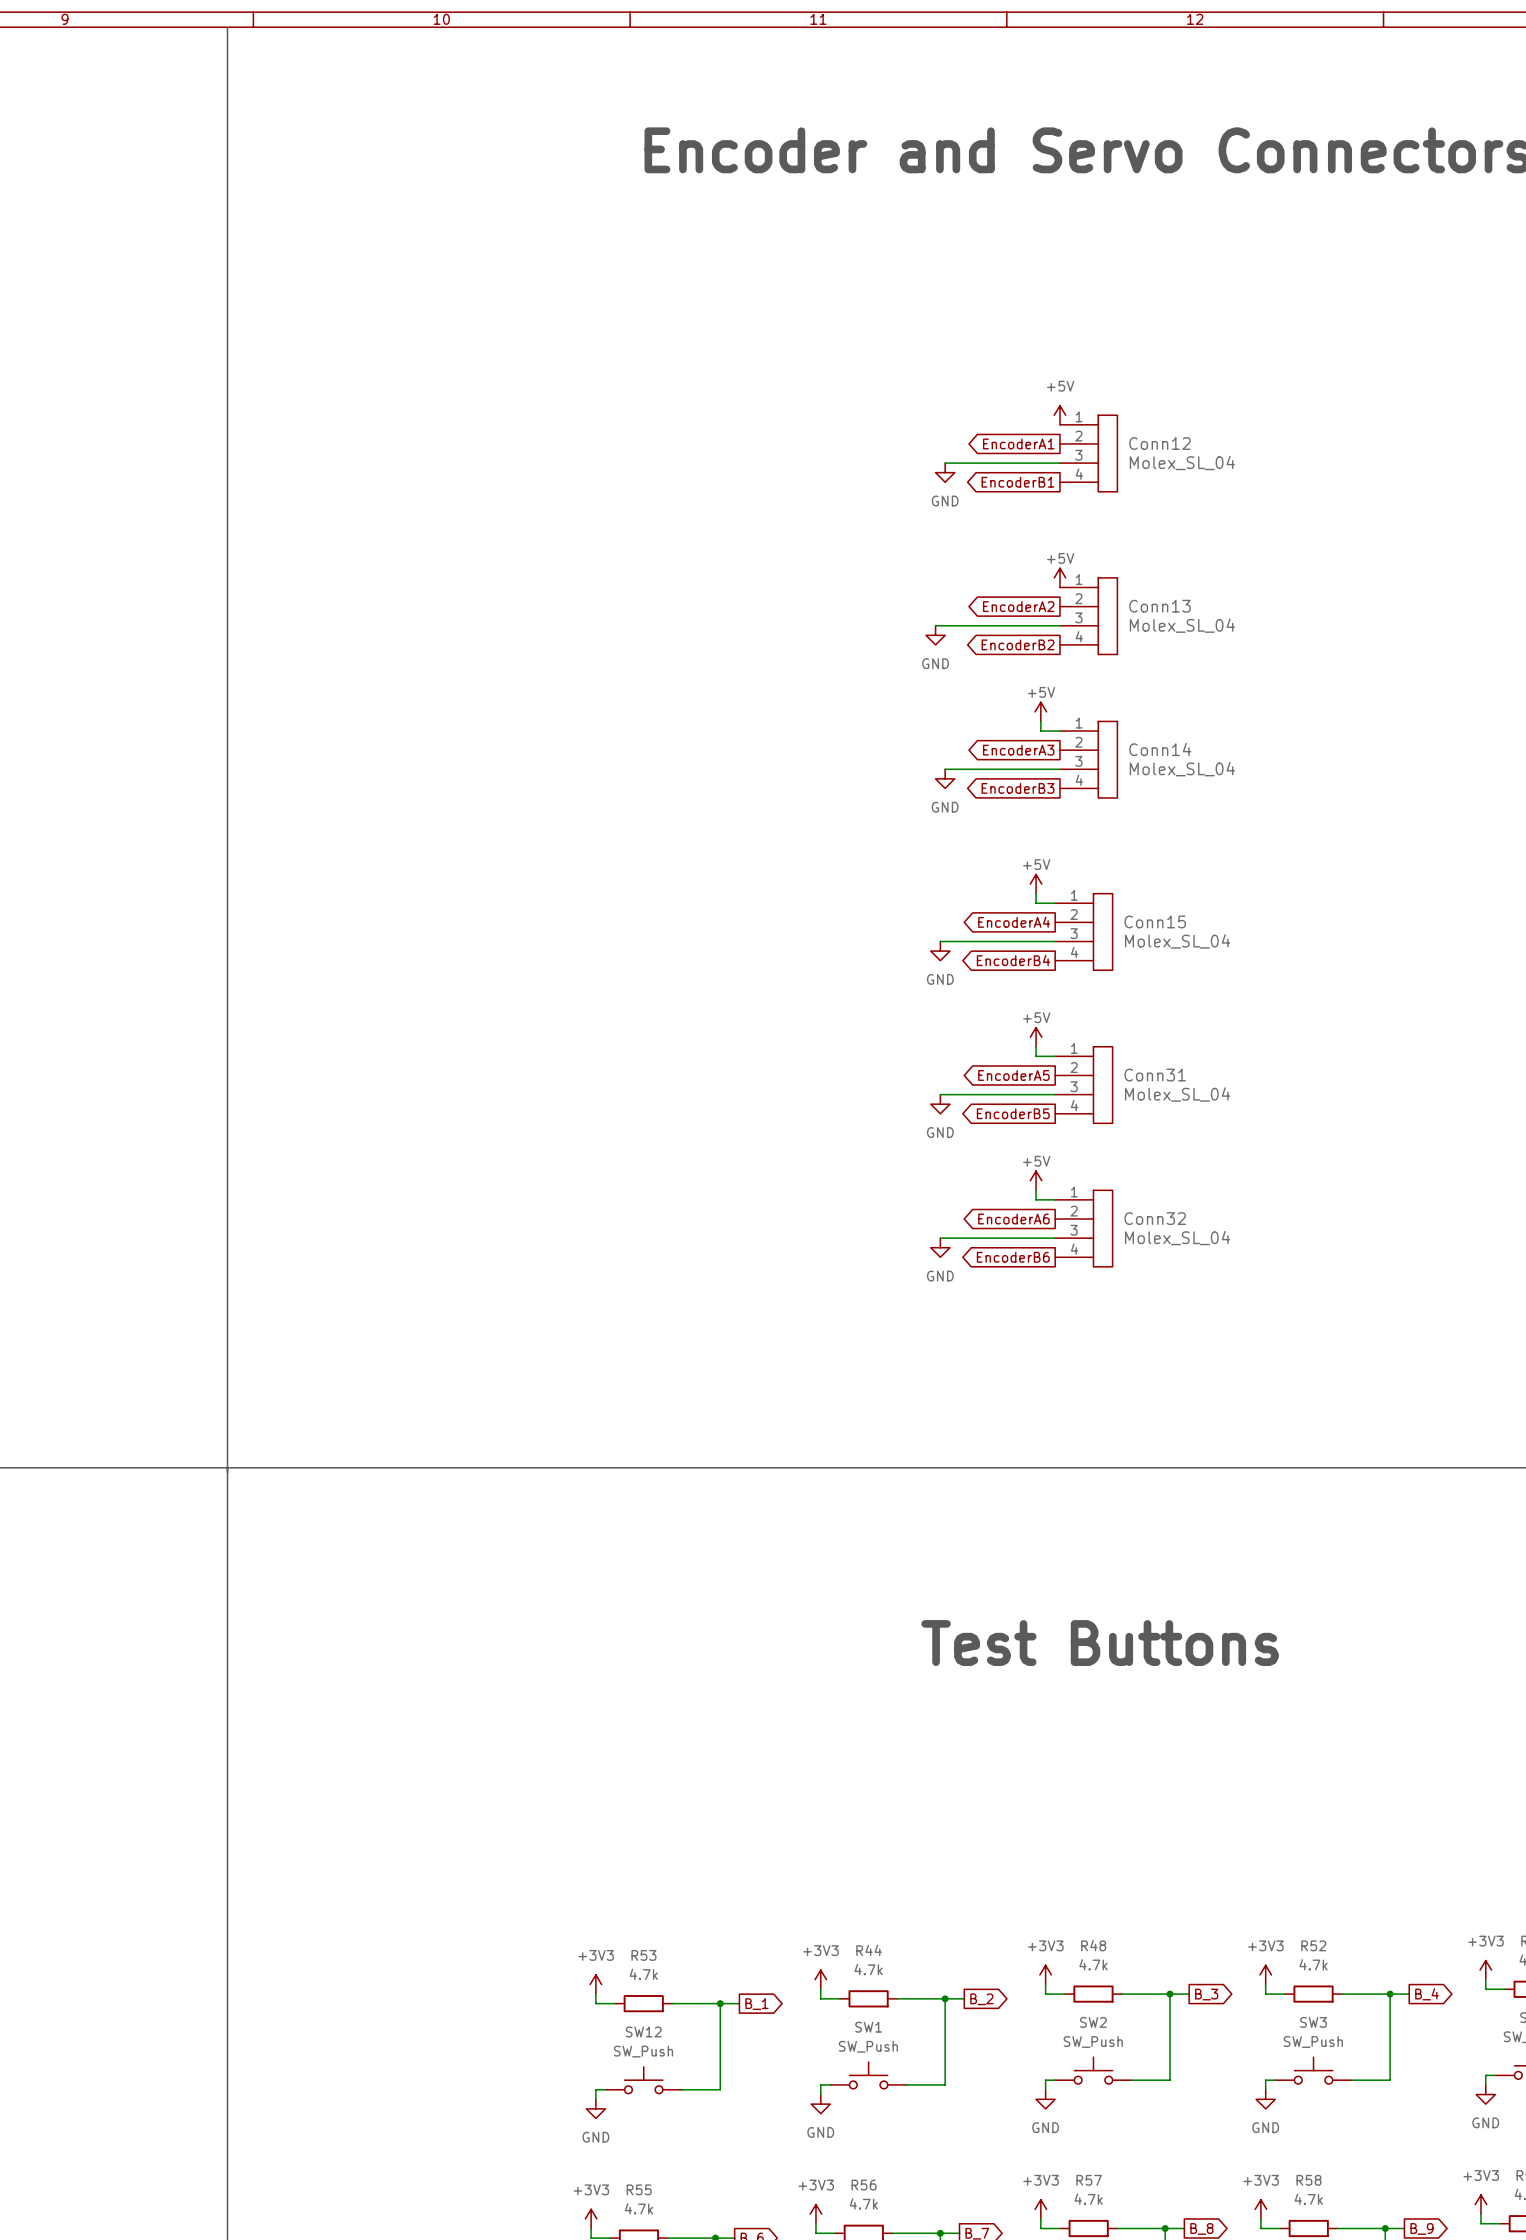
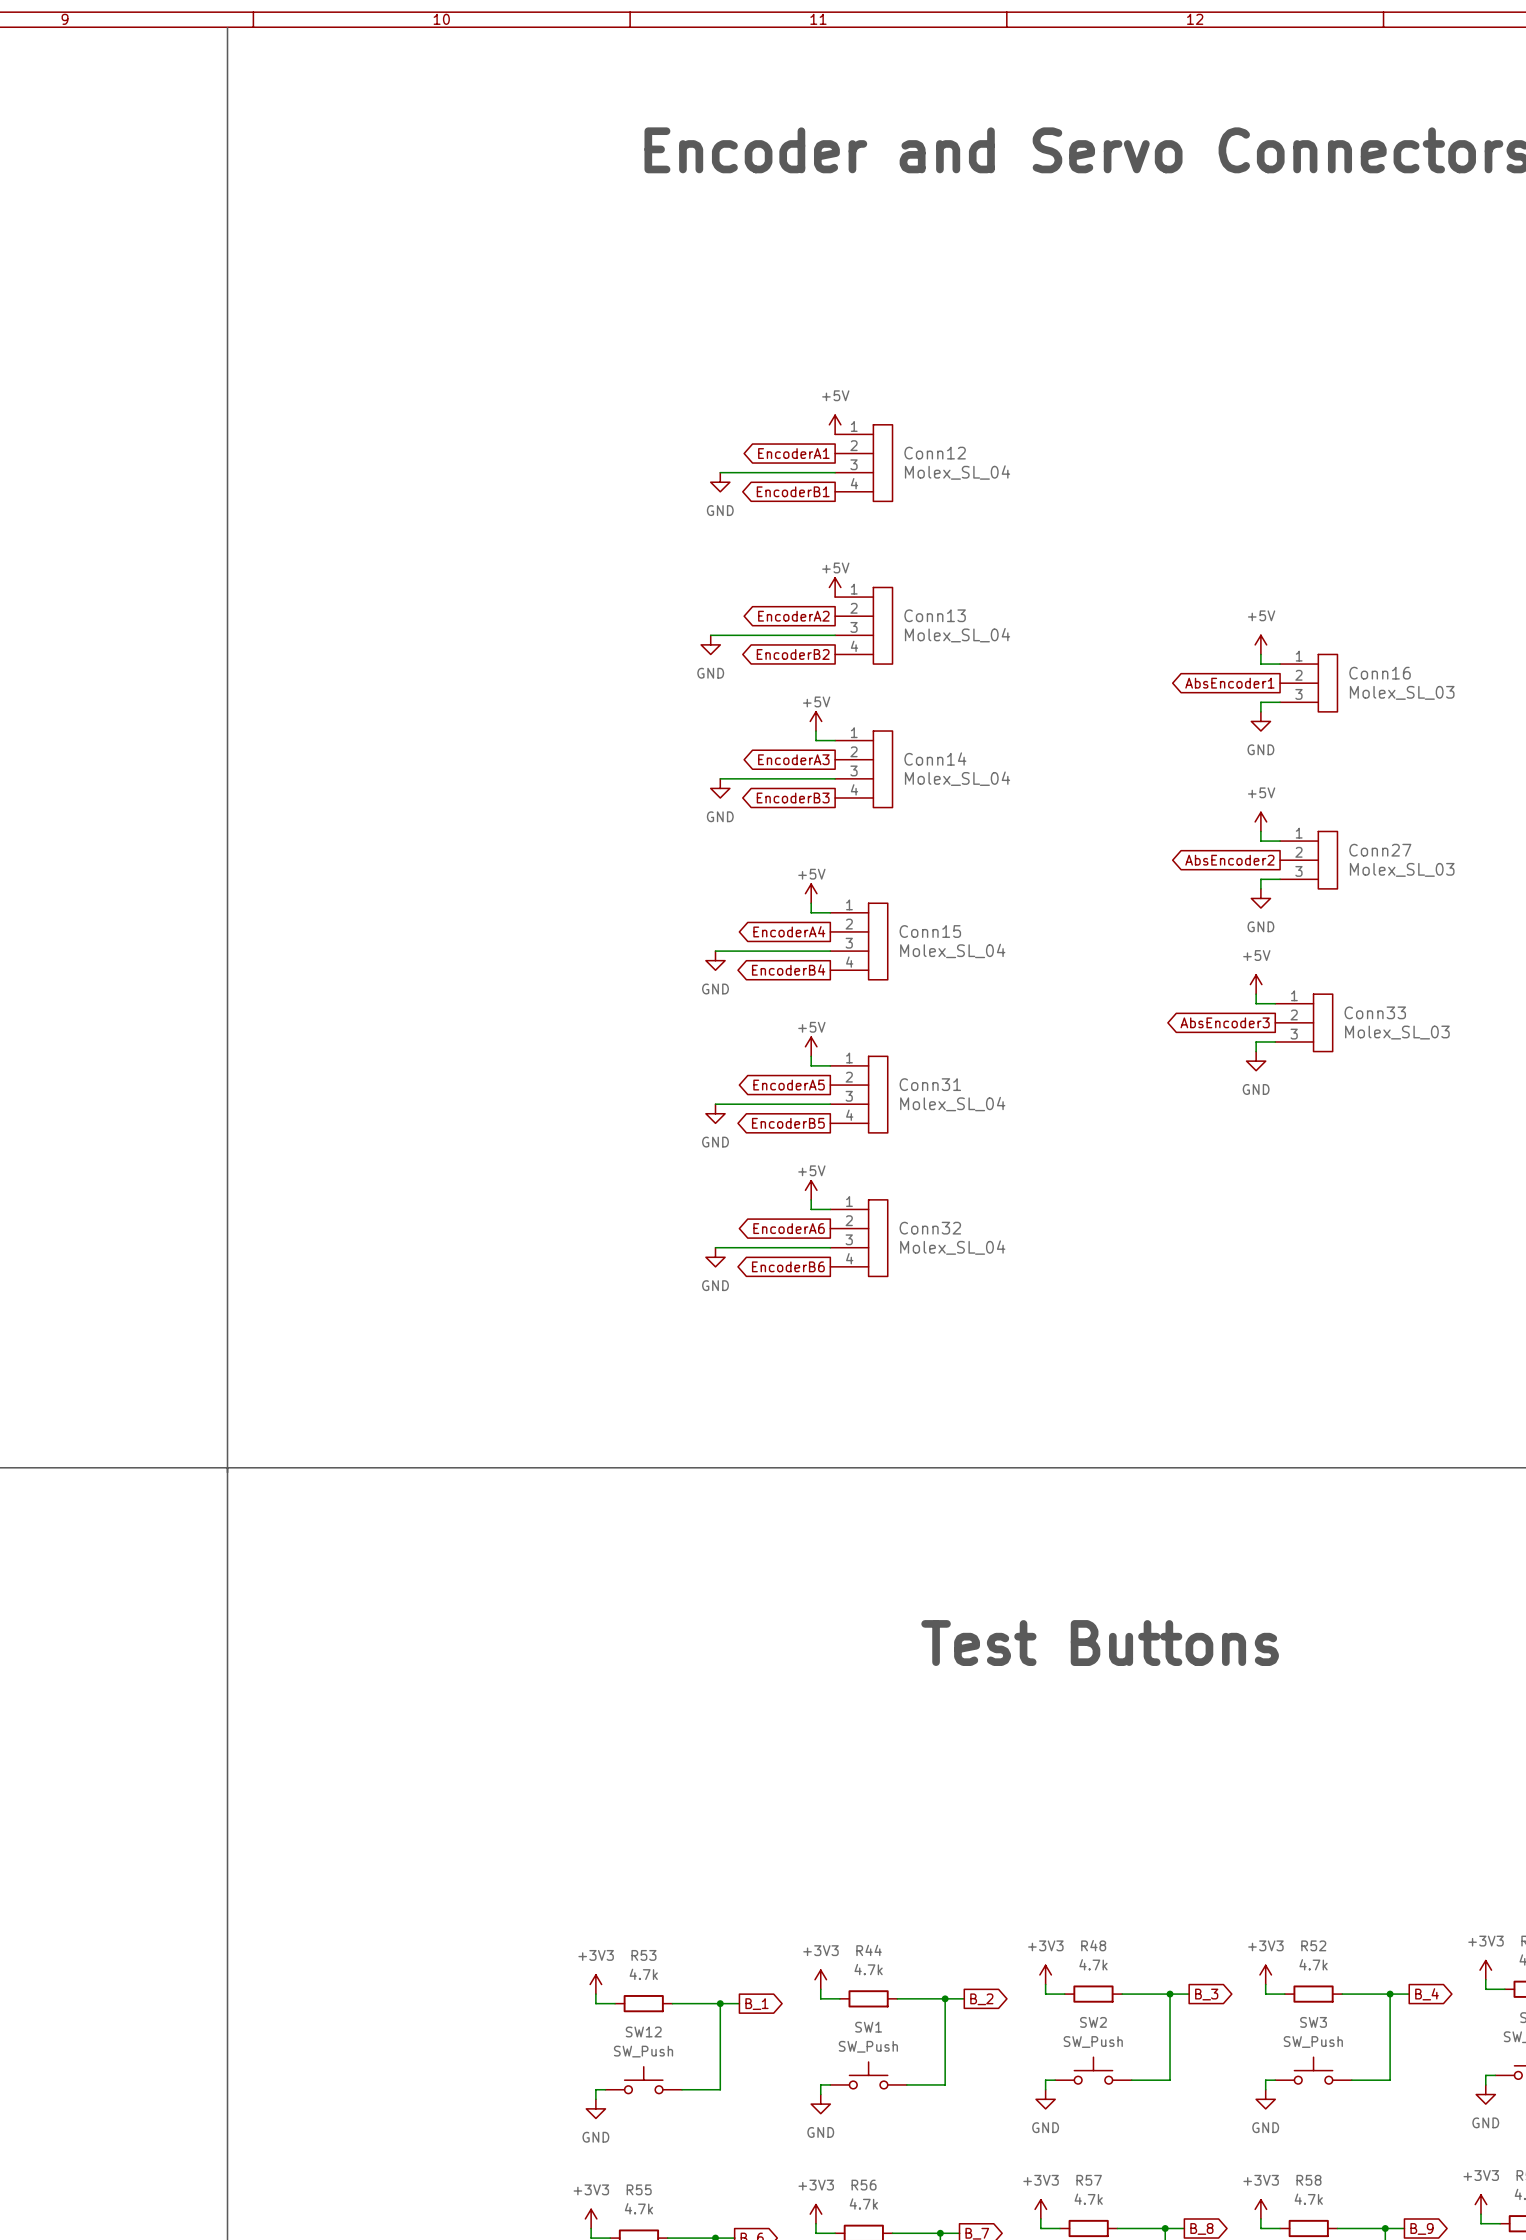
power symbol: +5V (1059, 415) -> none
power symbol: none -> +5V (835, 424)
global label: EncoderA1 (1018, 443) -> none
global label: none -> EncoderA1 (793, 453)
Conn12 position: (1088, 453) -> (863, 463)
wire: (945, 463) (1059, 463) -> none
wire: none -> (720, 472) (835, 472)
power symbol: GND (945, 472) -> none
power symbol: none -> GND (720, 482)
global label: EncoderB1 (1018, 482) -> none
global label: none -> EncoderB1 (793, 491)
power symbol: +5V (1059, 577) -> none
power symbol: none -> +5V (835, 587)
global label: EncoderA2 (1018, 606) -> none
global label: none -> EncoderA2 (793, 616)
Conn13 position: (1088, 616) -> (863, 625)
wire: (935, 625) (1059, 625) -> none
wire: none -> (710, 635) (835, 635)
power symbol: GND (935, 635) -> none
power symbol: none -> GND (710, 644)
global label: EncoderB2 (1018, 644) -> none
power symbol: none -> +5V (1260, 644)
global label: none -> EncoderB2 (793, 654)
wire: none -> (1260, 654) (1260, 664) (1280, 664)
global label: none -> AbsEncoder1 (1229, 683)
Conn16: none -> Molex_SL_03 (1308, 683)
wire: none -> (1280, 702) (1260, 702) (1260, 711)
power symbol: +5V (1040, 711) -> none
power symbol: none -> +5V (815, 721)
wire: (1040, 721) (1040, 731) (1059, 731) -> none
power symbol: none -> GND (1260, 721)
wire: none -> (815, 731) (815, 740) (835, 740)
global label: EncoderA3 (1018, 750) -> none
global label: none -> EncoderA3 (793, 759)
Conn14 position: (1088, 759) -> (863, 769)
wire: (945, 769) (1059, 769) -> none
wire: none -> (720, 778) (835, 778)
power symbol: GND (945, 778) -> none
power symbol: none -> GND (720, 788)
global label: EncoderB3 (1018, 788) -> none
global label: none -> EncoderB3 (793, 797)
power symbol: none -> +5V (1260, 821)
wire: none -> (1260, 831) (1260, 841) (1280, 841)
global label: none -> AbsEncoder2 (1229, 860)
Conn27: none -> Molex_SL_03 (1308, 860)
wire: none -> (1280, 879) (1260, 879) (1260, 888)
power symbol: +5V (1036, 884) -> none
power symbol: none -> +5V (811, 893)
wire: (1036, 893) (1036, 903) (1055, 903) -> none
power symbol: none -> GND (1260, 898)
wire: none -> (811, 903) (811, 912) (830, 912)
global label: EncoderA4 (1014, 922) -> none
global label: none -> EncoderA4 (789, 931)
Conn15 position: (1083, 931) -> (859, 941)
wire: (940, 941) (1055, 941) -> none
wire: none -> (715, 951) (830, 951)
power symbol: GND (940, 951) -> none
power symbol: none -> GND (715, 960)
global label: EncoderB4 (1013, 960) -> none
global label: none -> EncoderB4 (788, 970)
power symbol: none -> +5V (1256, 984)
wire: none -> (1256, 994) (1256, 1003) (1275, 1003)
global label: none -> AbsEncoder3 (1225, 1022)
Conn33: none -> Molex_SL_03 (1303, 1022)
power symbol: +5V (1036, 1037) -> none
wire: none -> (1275, 1041) (1256, 1041) (1256, 1051)
power symbol: none -> +5V (811, 1046)
wire: (1036, 1046) (1036, 1056) (1055, 1056) -> none
wire: none -> (811, 1056) (811, 1065) (830, 1065)
power symbol: none -> GND (1256, 1061)
global label: EncoderA5 (1013, 1075) -> none
global label: none -> EncoderA5 (789, 1085)
Conn31 position: (1083, 1085) -> (859, 1094)
wire: (940, 1094) (1055, 1094) -> none
wire: none -> (715, 1104) (830, 1104)
power symbol: GND (940, 1104) -> none
power symbol: none -> GND (715, 1113)
global label: EncoderB5 (1013, 1113) -> none
global label: none -> EncoderB5 (788, 1123)
power symbol: +5V (1036, 1180) -> none
power symbol: none -> +5V (811, 1190)
wire: (1036, 1190) (1036, 1199) (1055, 1199) -> none
wire: none -> (811, 1199) (811, 1209) (830, 1209)
global label: EncoderA6 (1013, 1219) -> none
global label: none -> EncoderA6 (789, 1228)
Conn32 position: (1083, 1228) -> (859, 1238)
wire: (940, 1238) (1055, 1238) -> none
wire: none -> (715, 1247) (830, 1247)
power symbol: GND (940, 1247) -> none
power symbol: none -> GND (715, 1257)
global label: EncoderB6 (1013, 1257) -> none
global label: none -> EncoderB6 (788, 1266)

